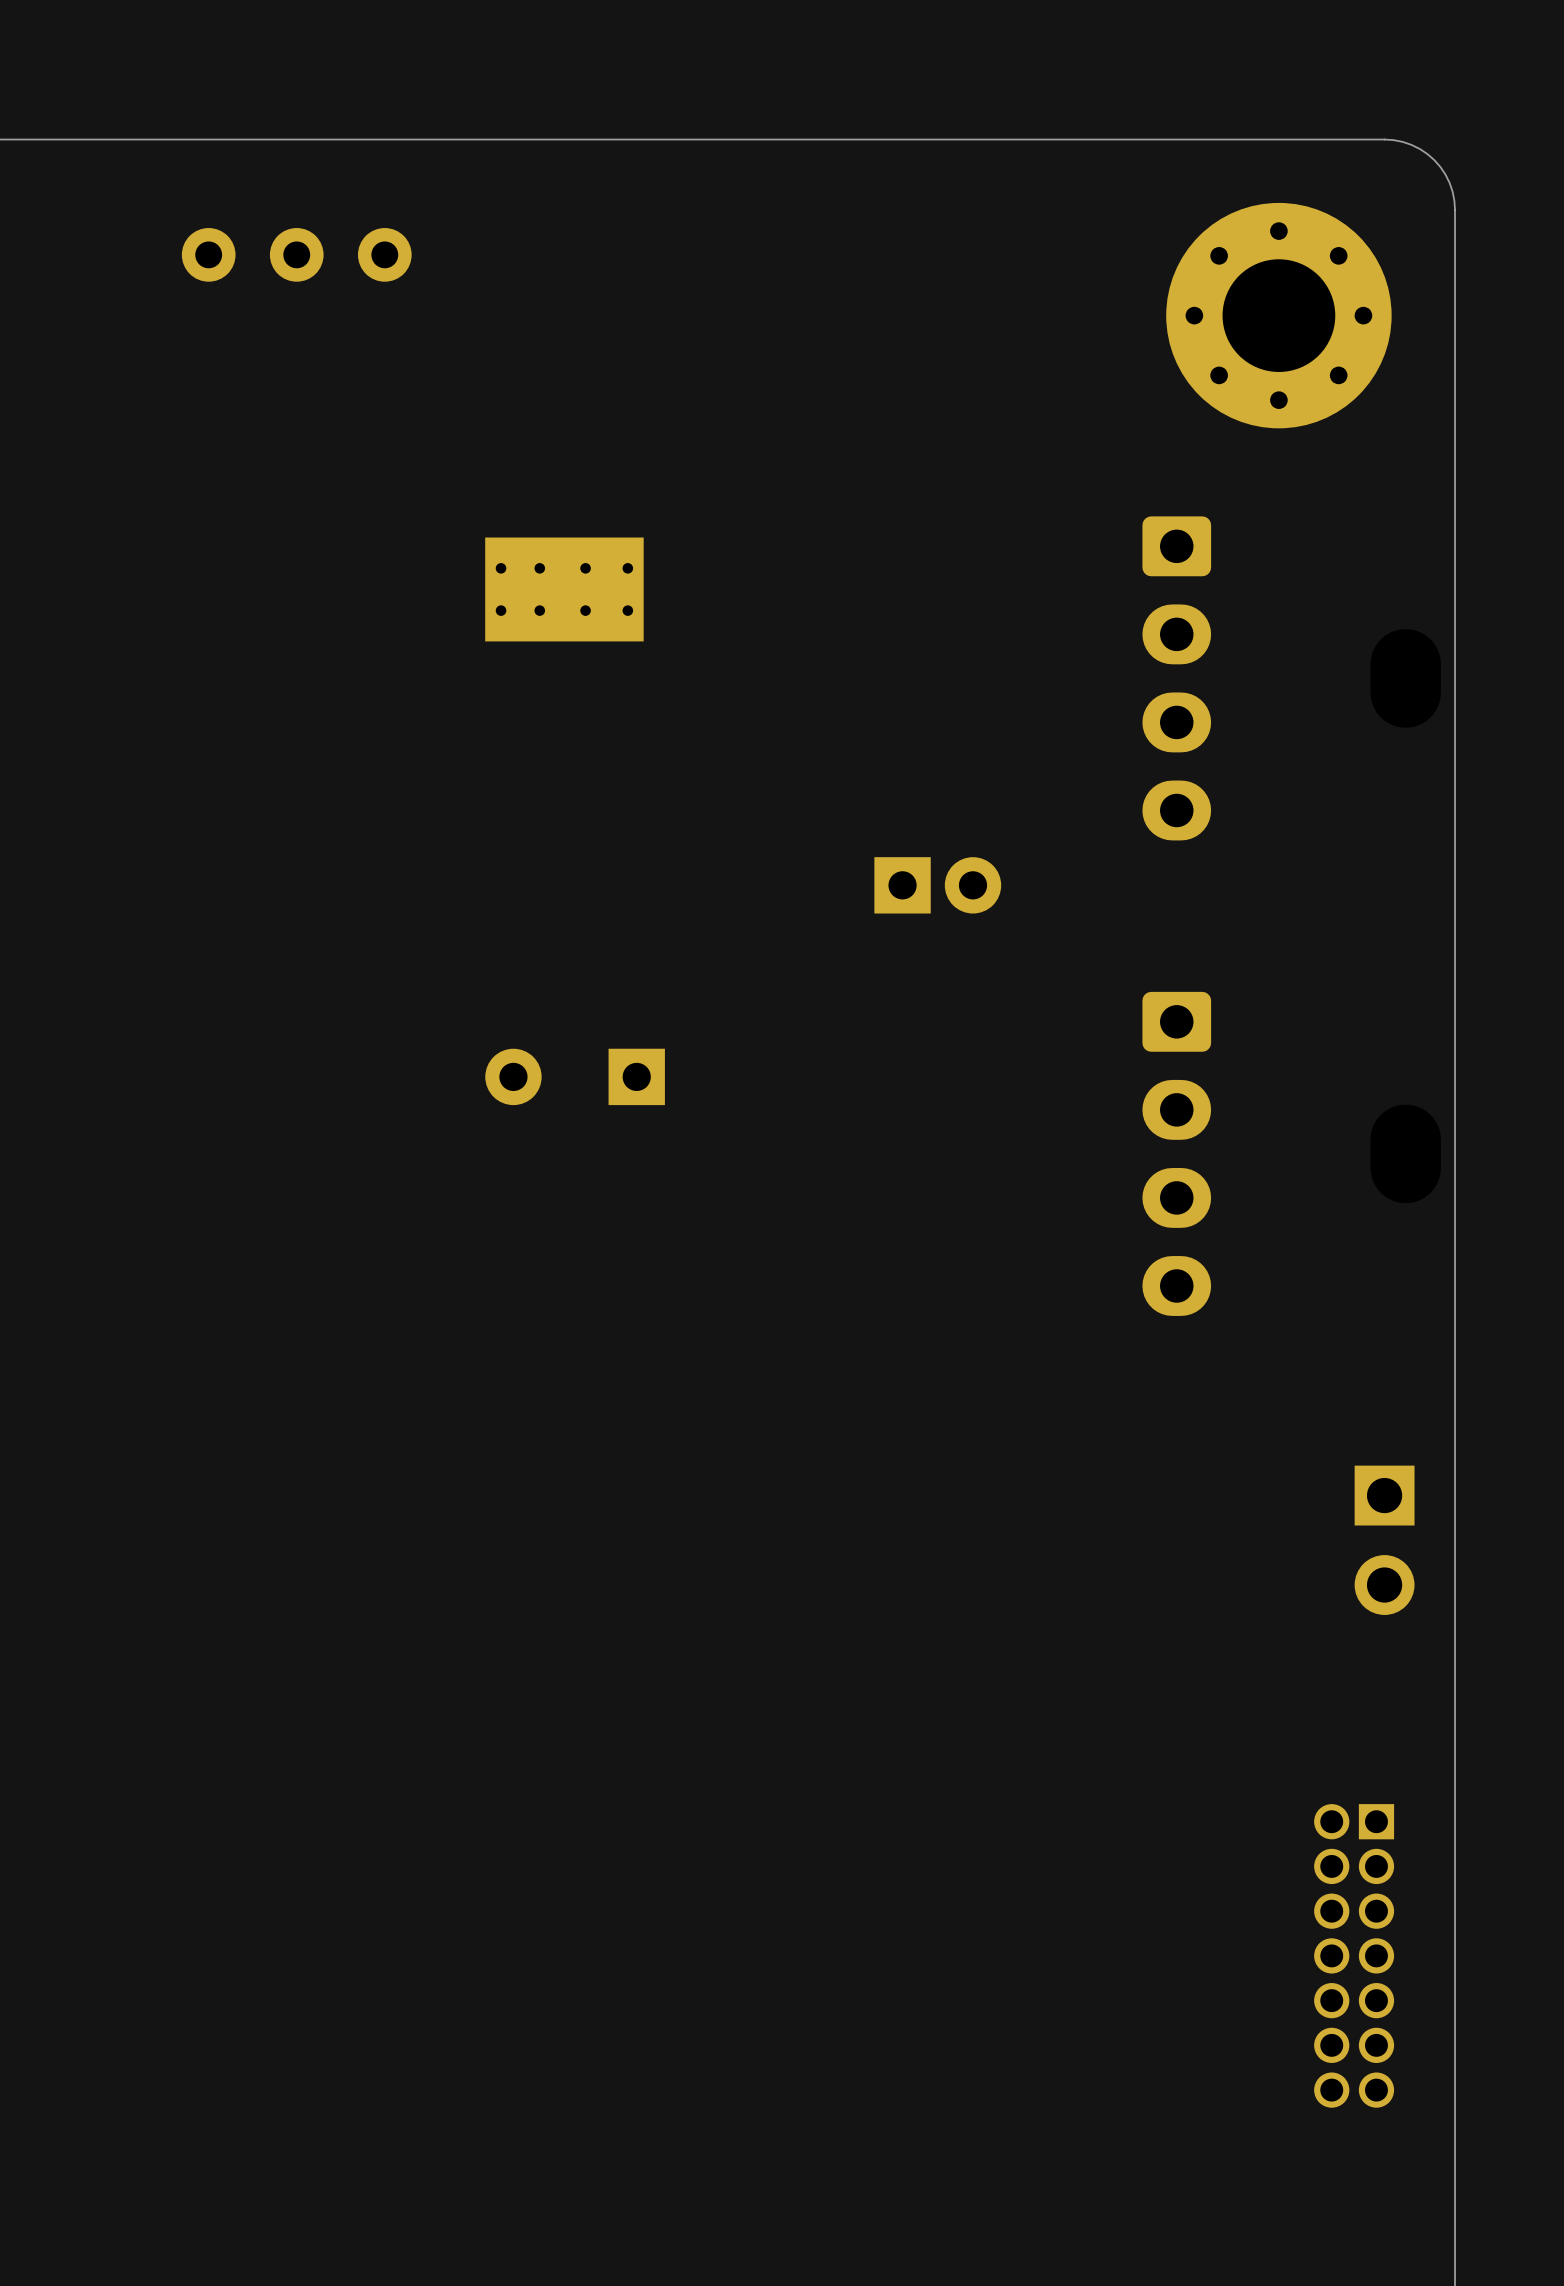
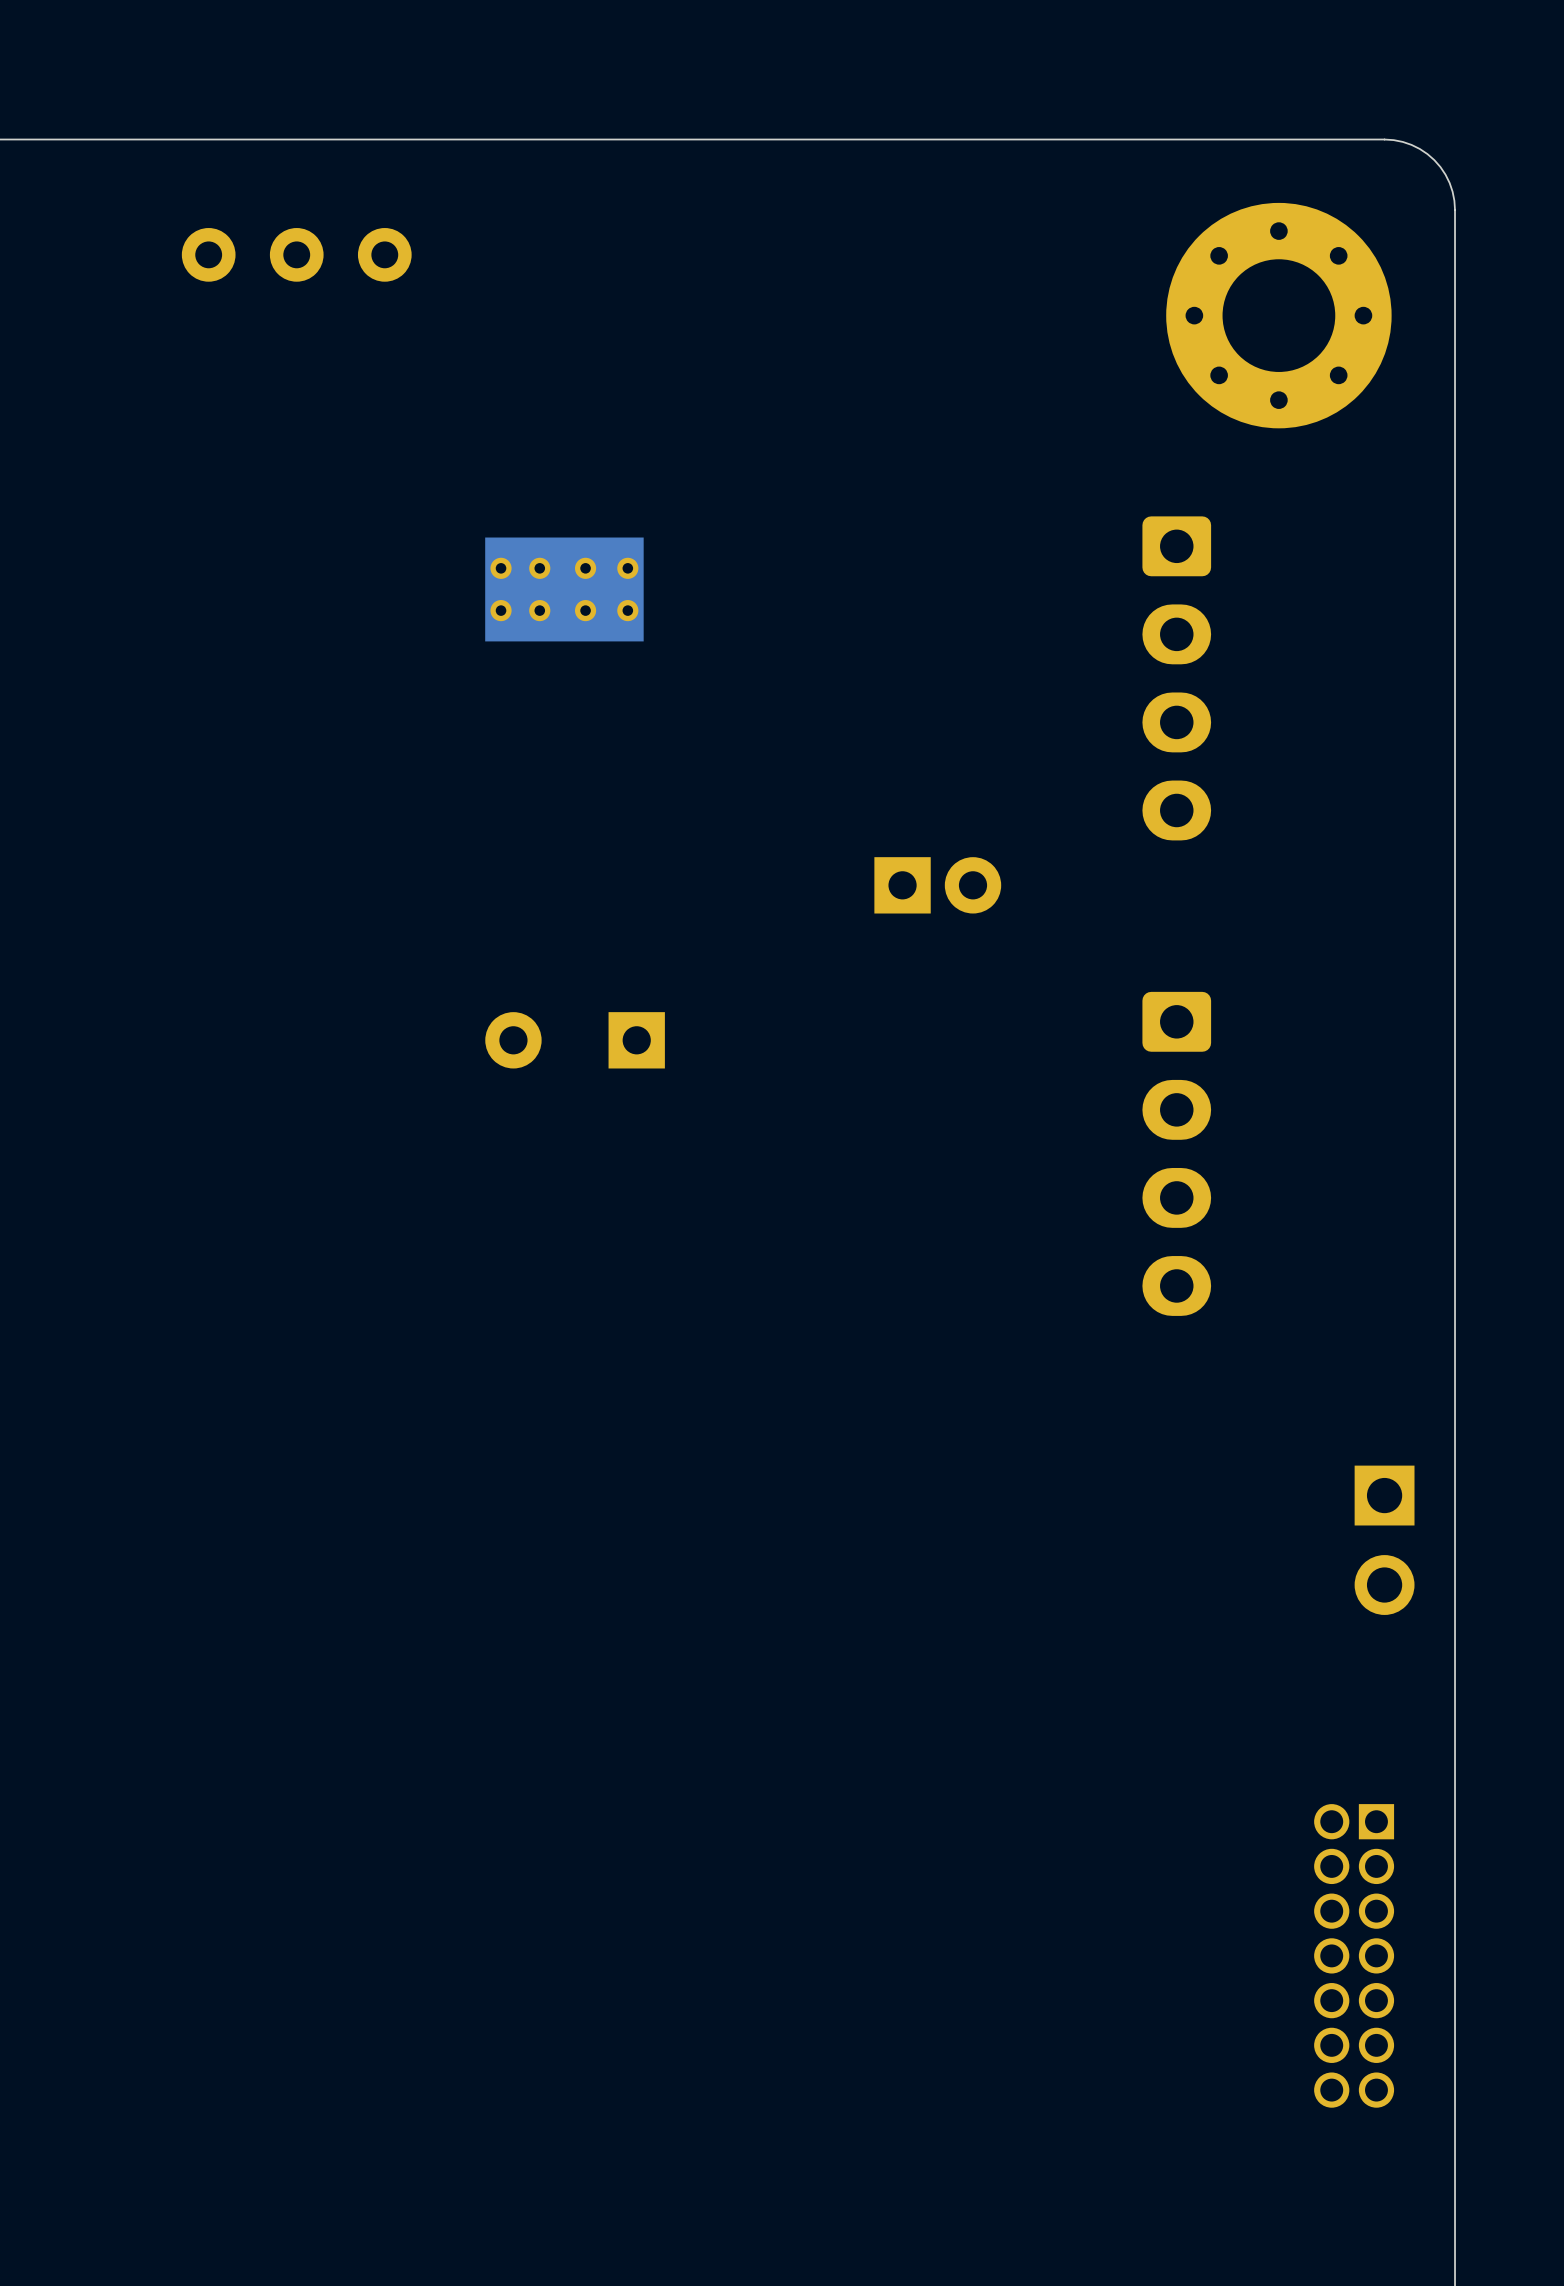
part position: (575, 1076) -> (575, 1040)

